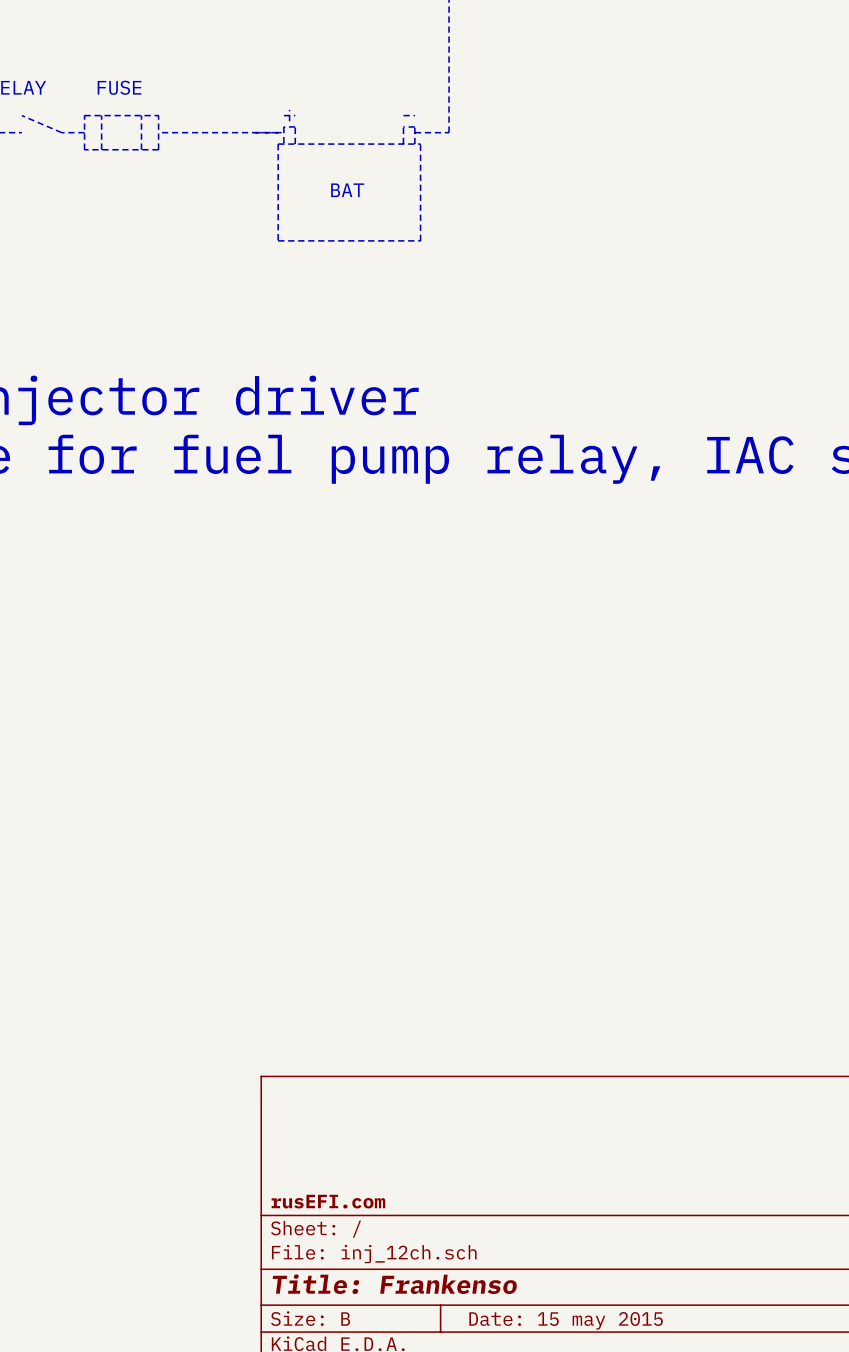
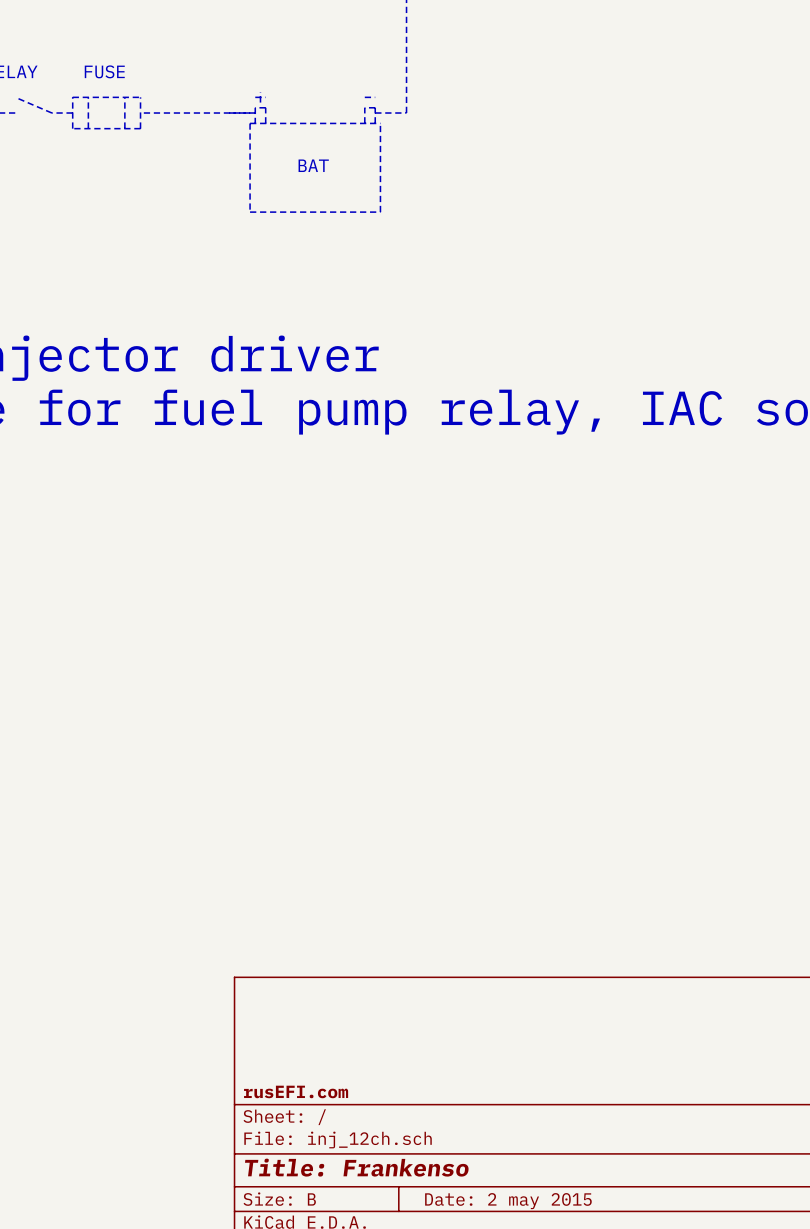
title block: Date: 15 may 2015 (566, 1320) -> Date: 2 may 2015 (508, 1201)

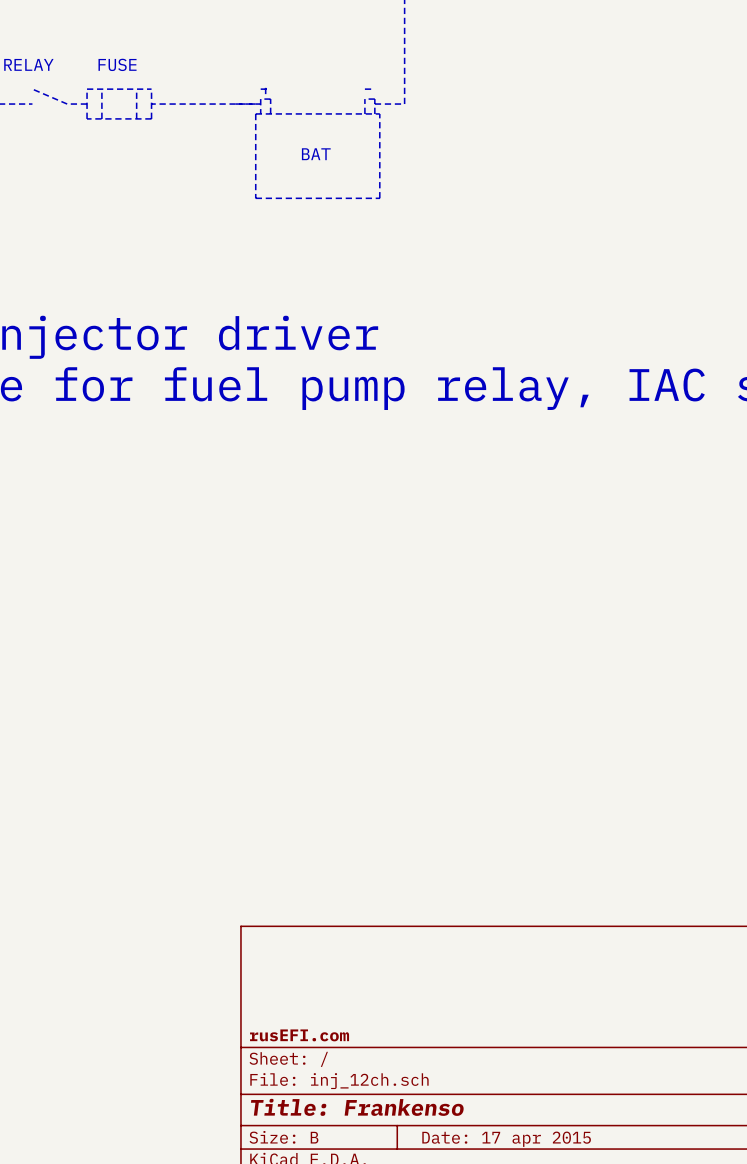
title block: Date: 2 may 2015 (508, 1201) -> Date: 17 apr 2015 (506, 1139)

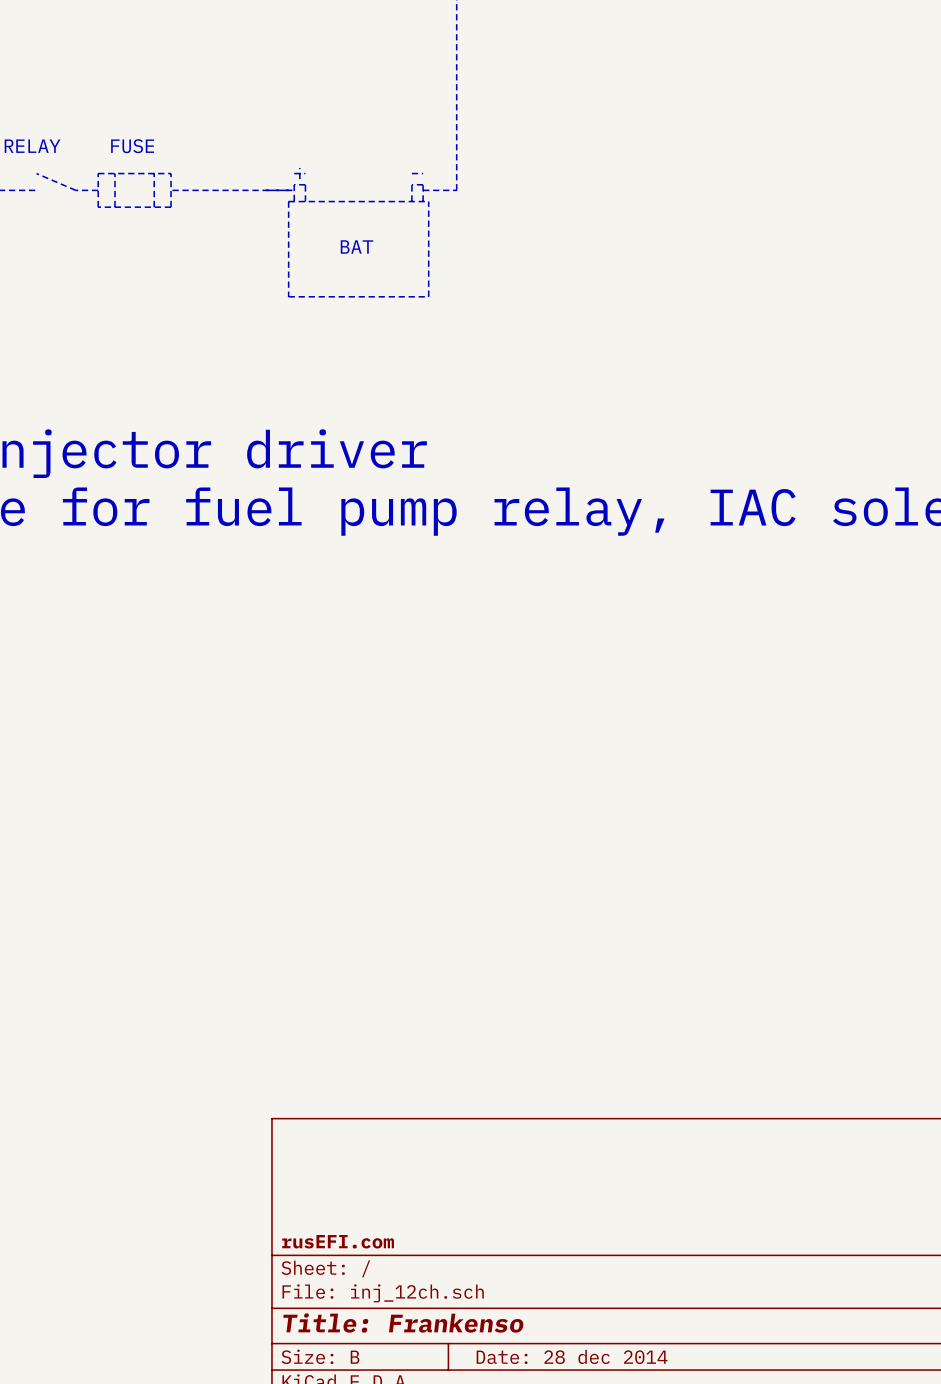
title block: Date: 17 apr 2015 (506, 1139) -> Date: 28 dec 2014 (572, 1356)

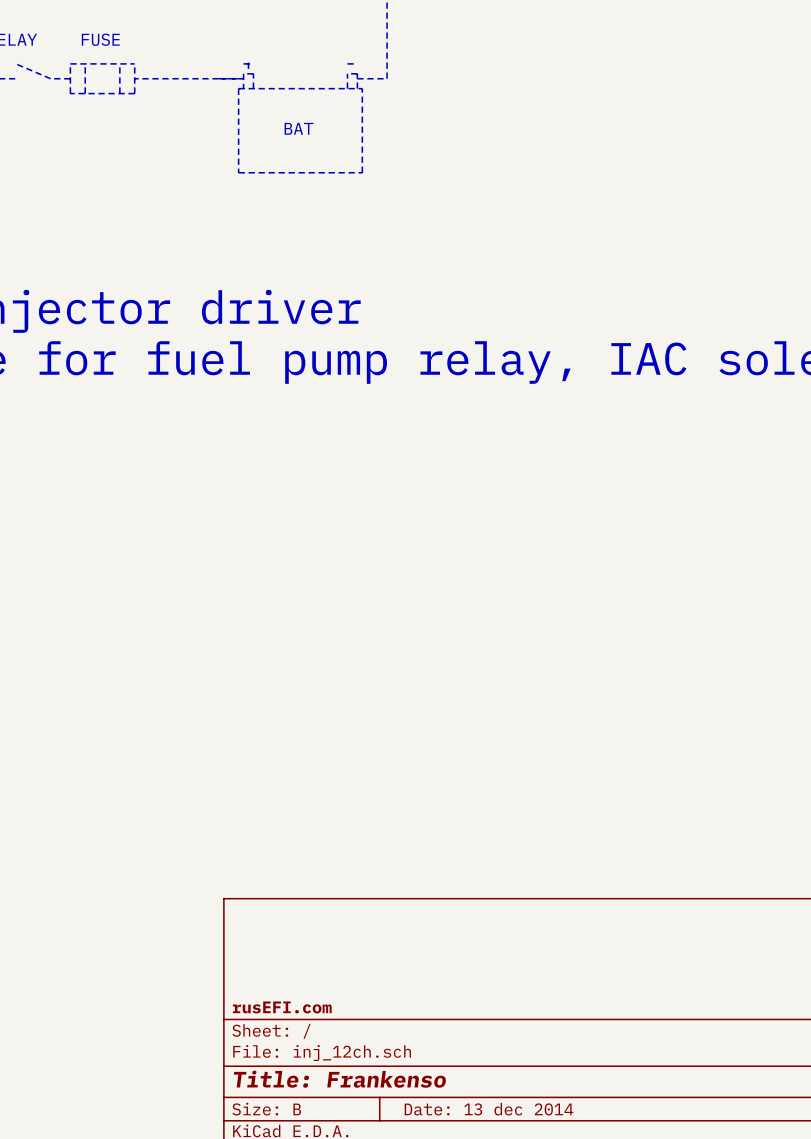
title block: Date: 28 dec 2014 (572, 1356) -> Date: 13 dec 2014 (488, 1109)

